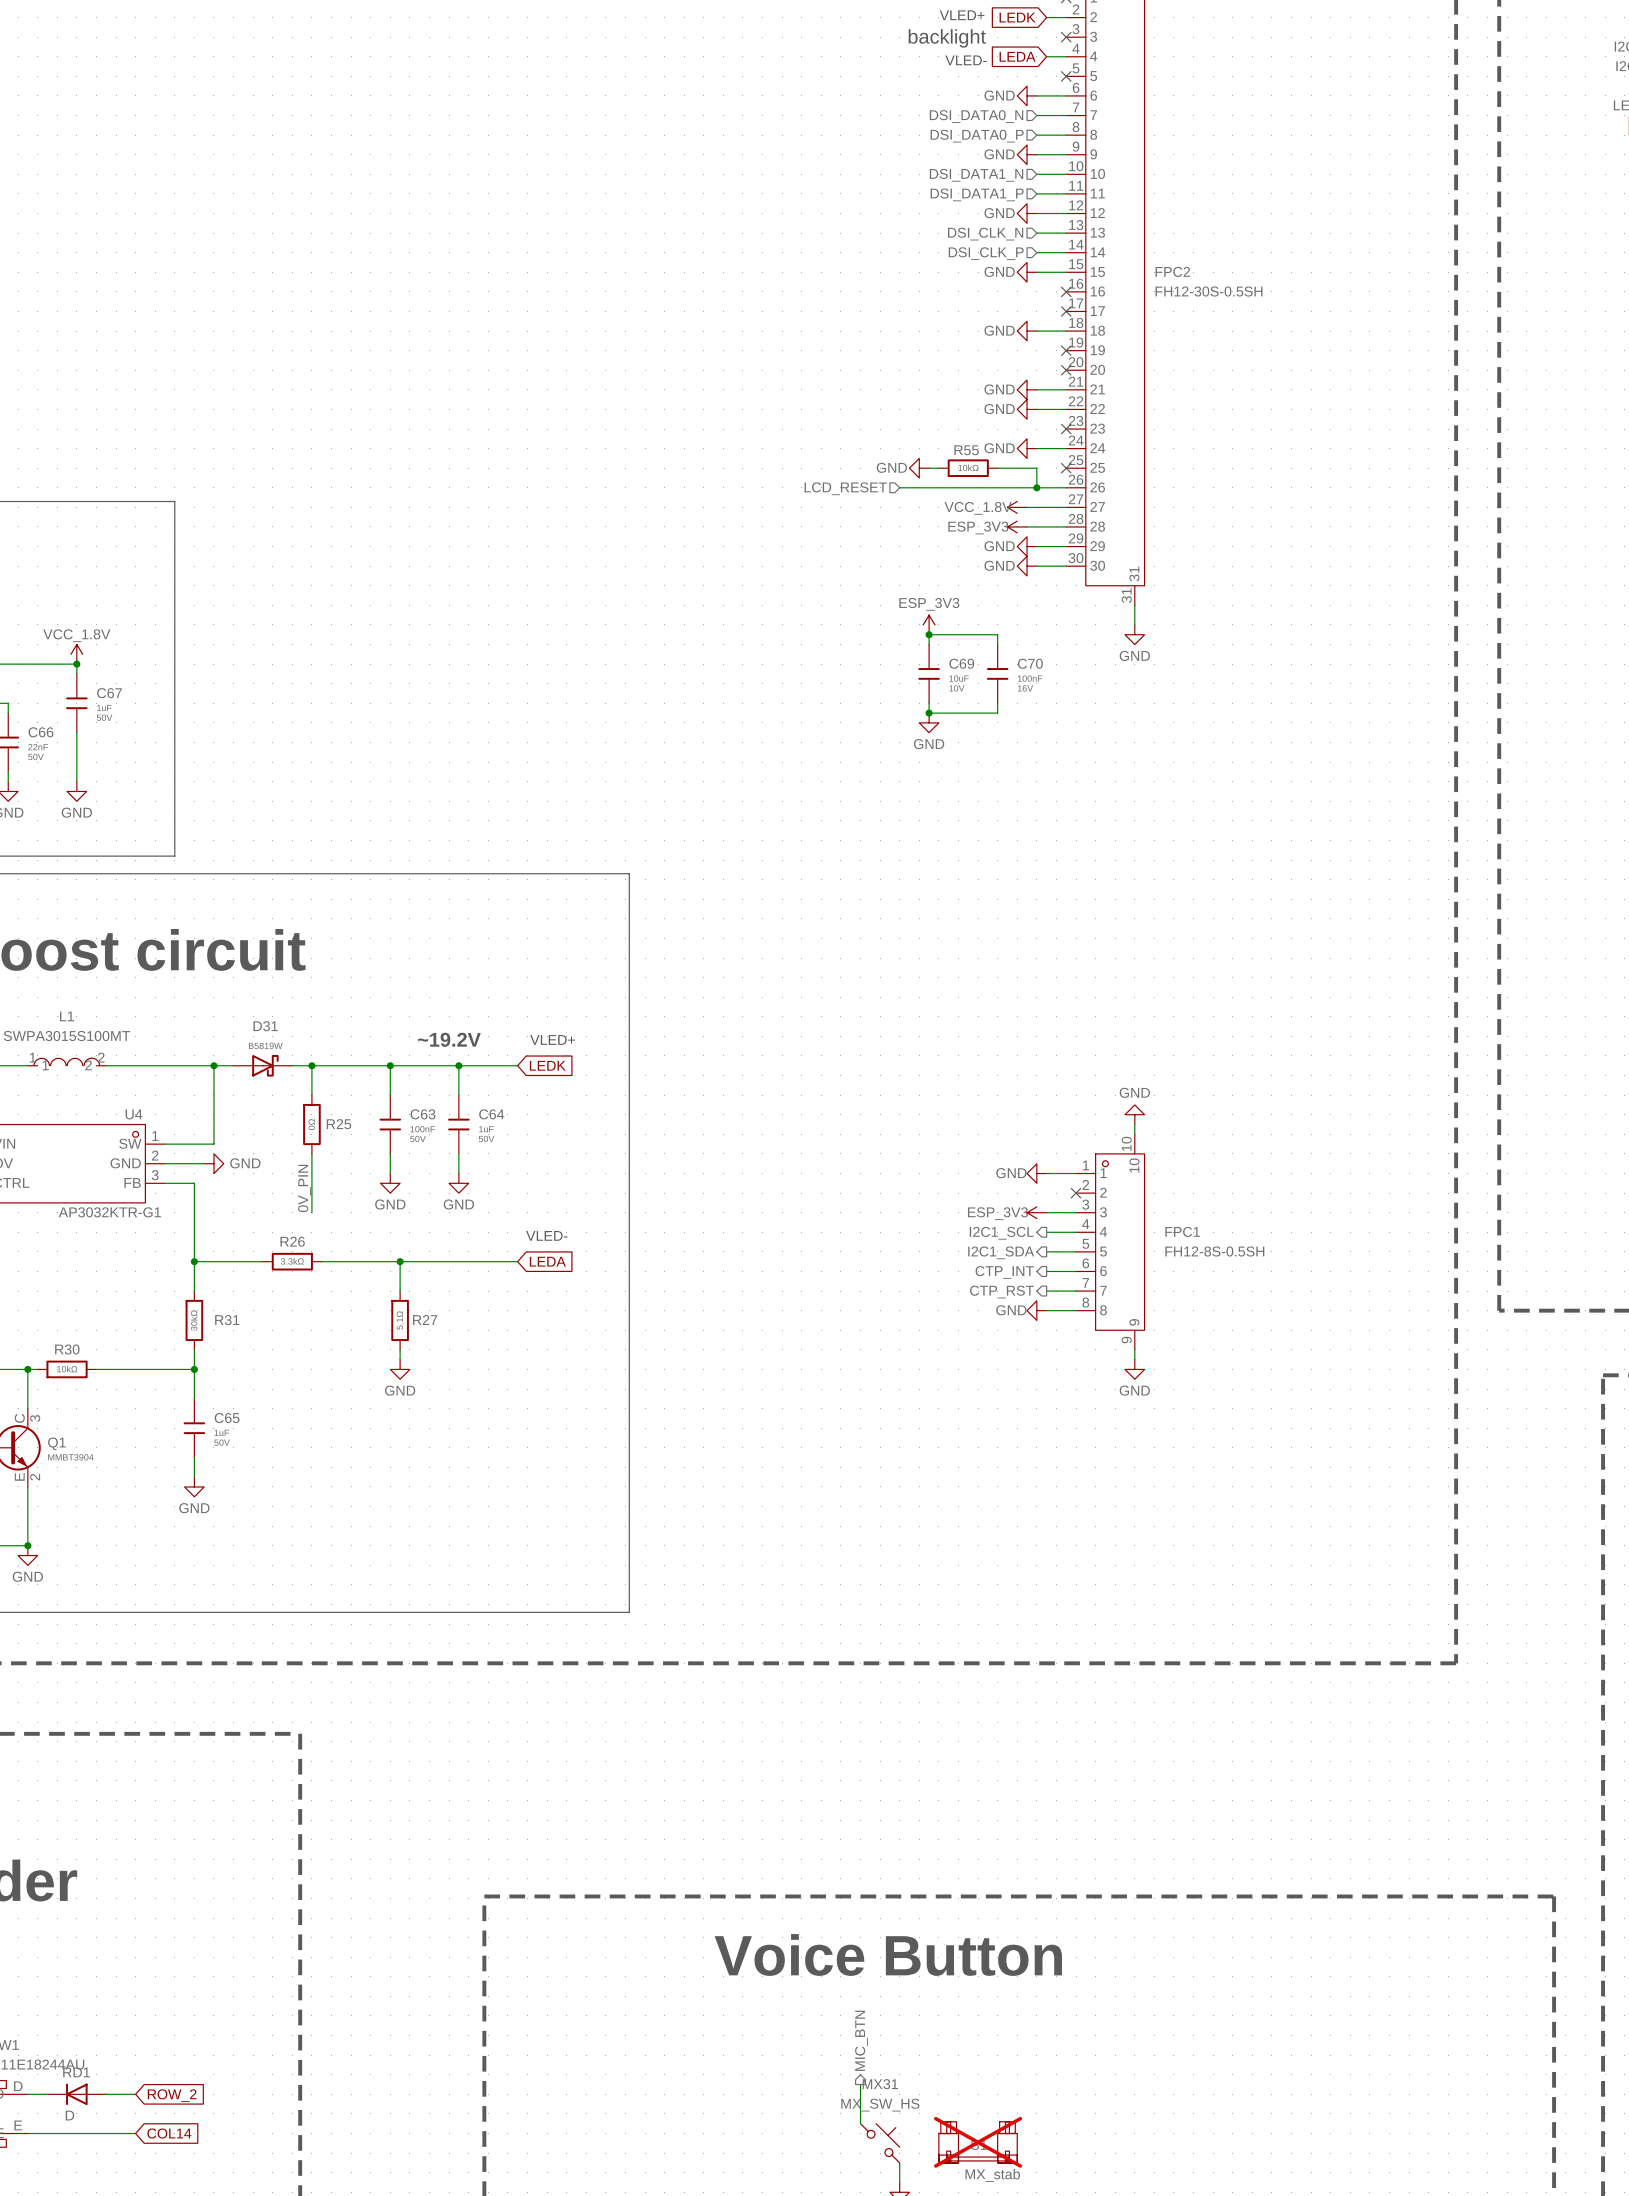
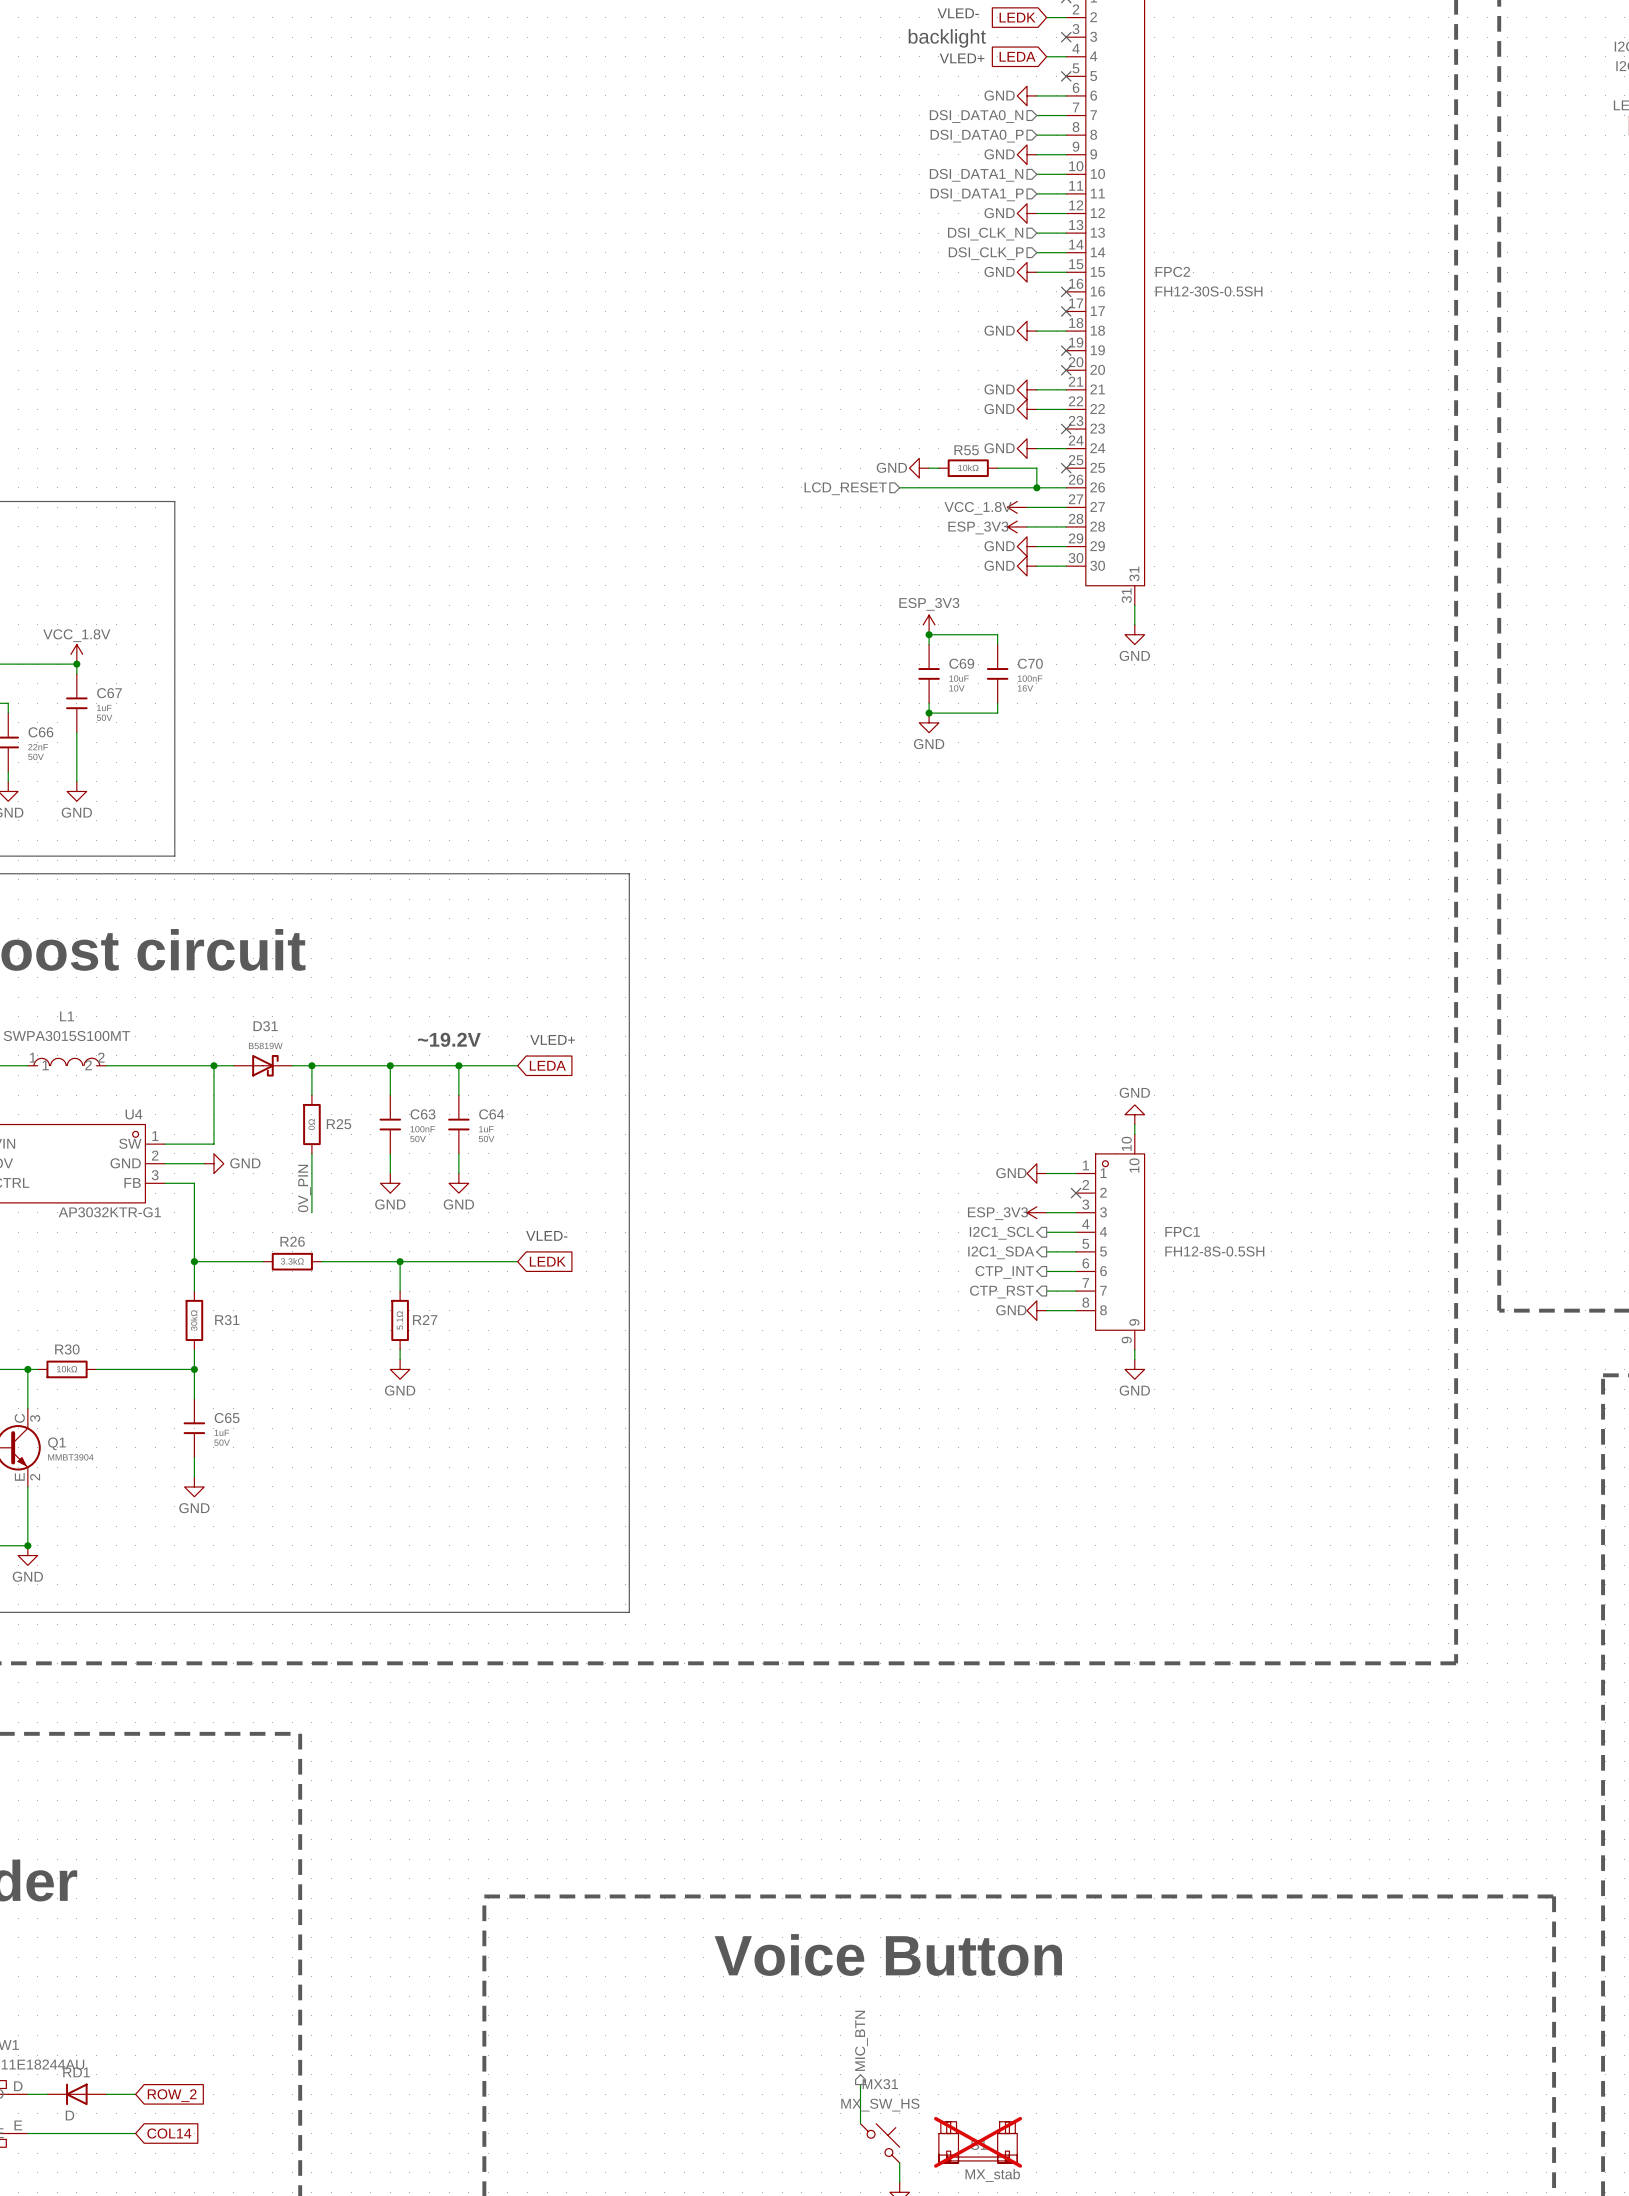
text: VLED+ (962, 15) -> VLED- (958, 13)
text: VLED- (966, 60) -> VLED+ (962, 58)
global label: LEDK (547, 1065) -> LEDA (547, 1065)
global label: LEDA (547, 1261) -> LEDK (547, 1261)

